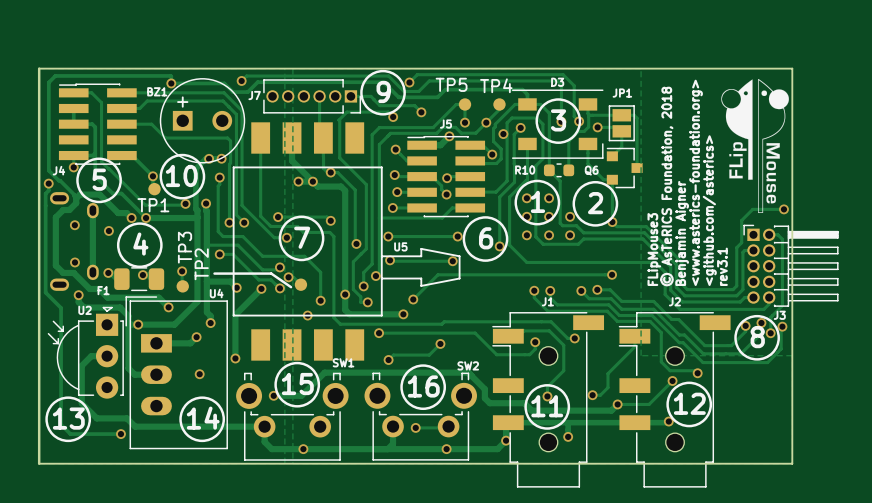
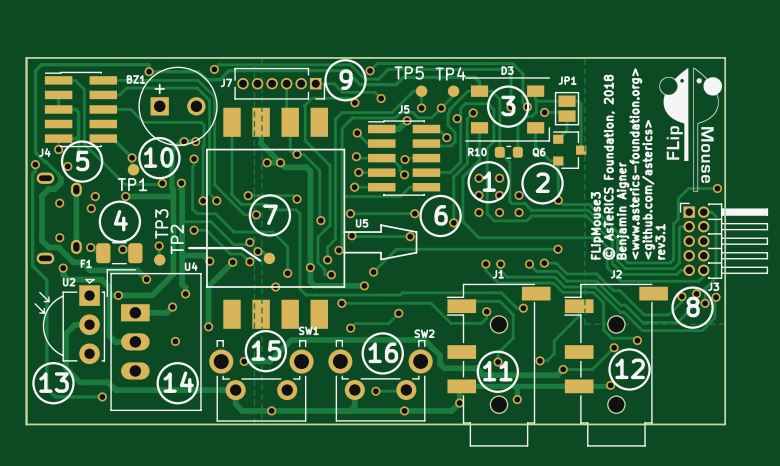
track: (95, 175) (112, 193) (121, 193) (146, 218) -> none
via: none -> (67, 166)
track: (76, 198) (79, 194) (99, 194) (118, 213) (126, 213) (131, 218) -> none
via position: (131, 218) -> (95, 196)

